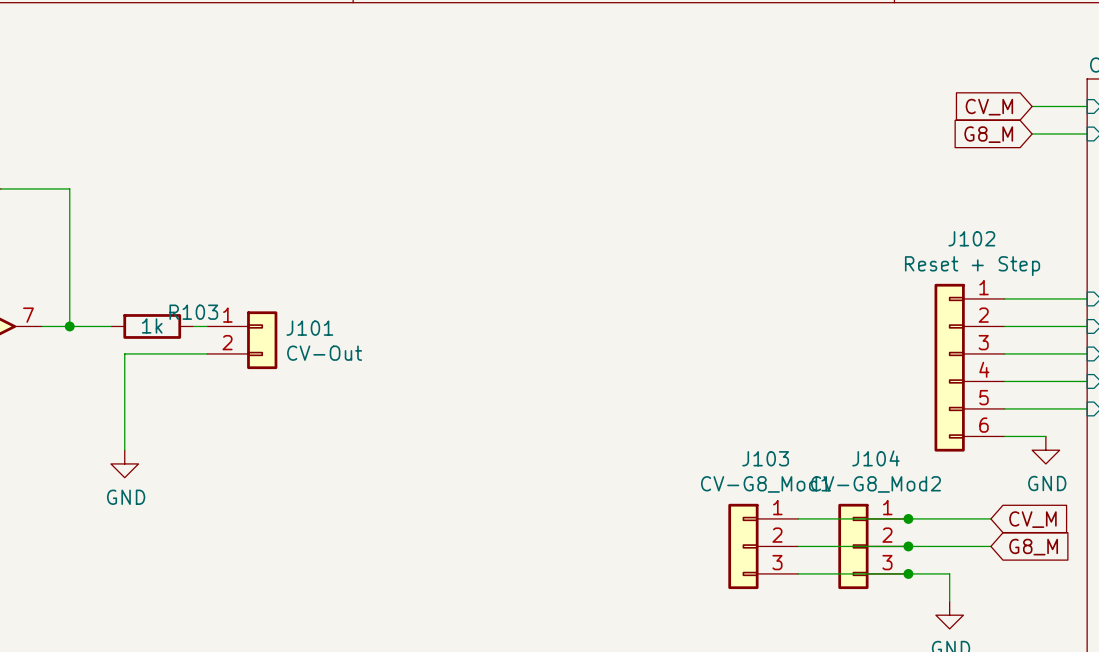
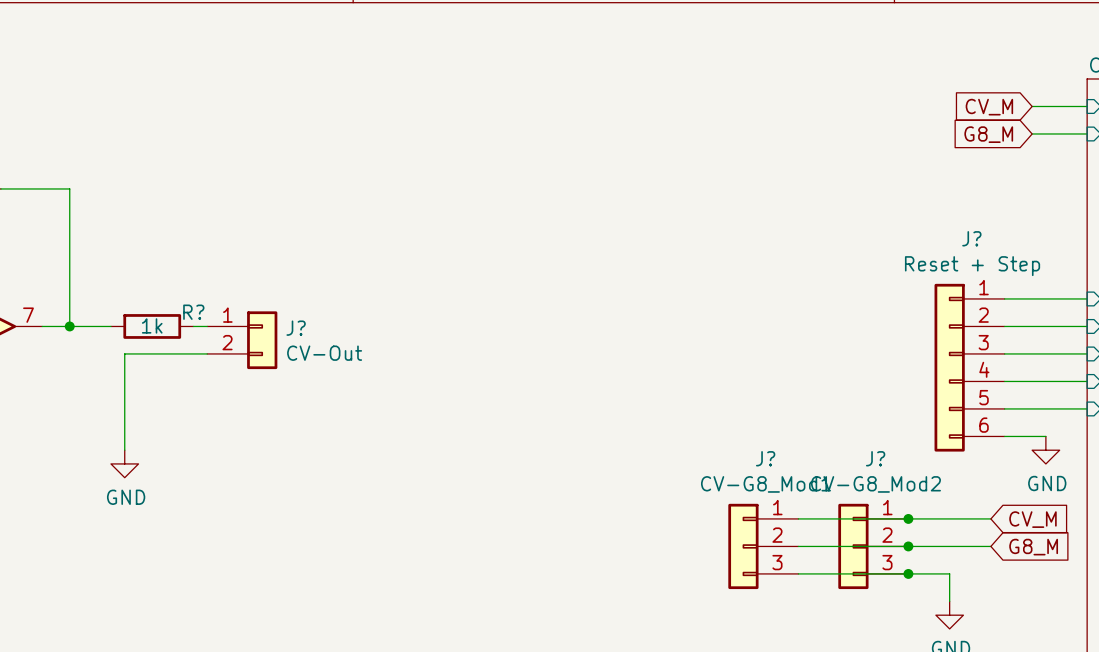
J102 name: J102 (971, 238) -> J? (971, 238)
R103 name: R103 (193, 312) -> R? (193, 312)
J101 name: J101 (309, 328) -> J? (296, 328)
J103 name: J103 (765, 458) -> J? (765, 458)
J104 name: J104 (875, 458) -> J? (875, 458)

